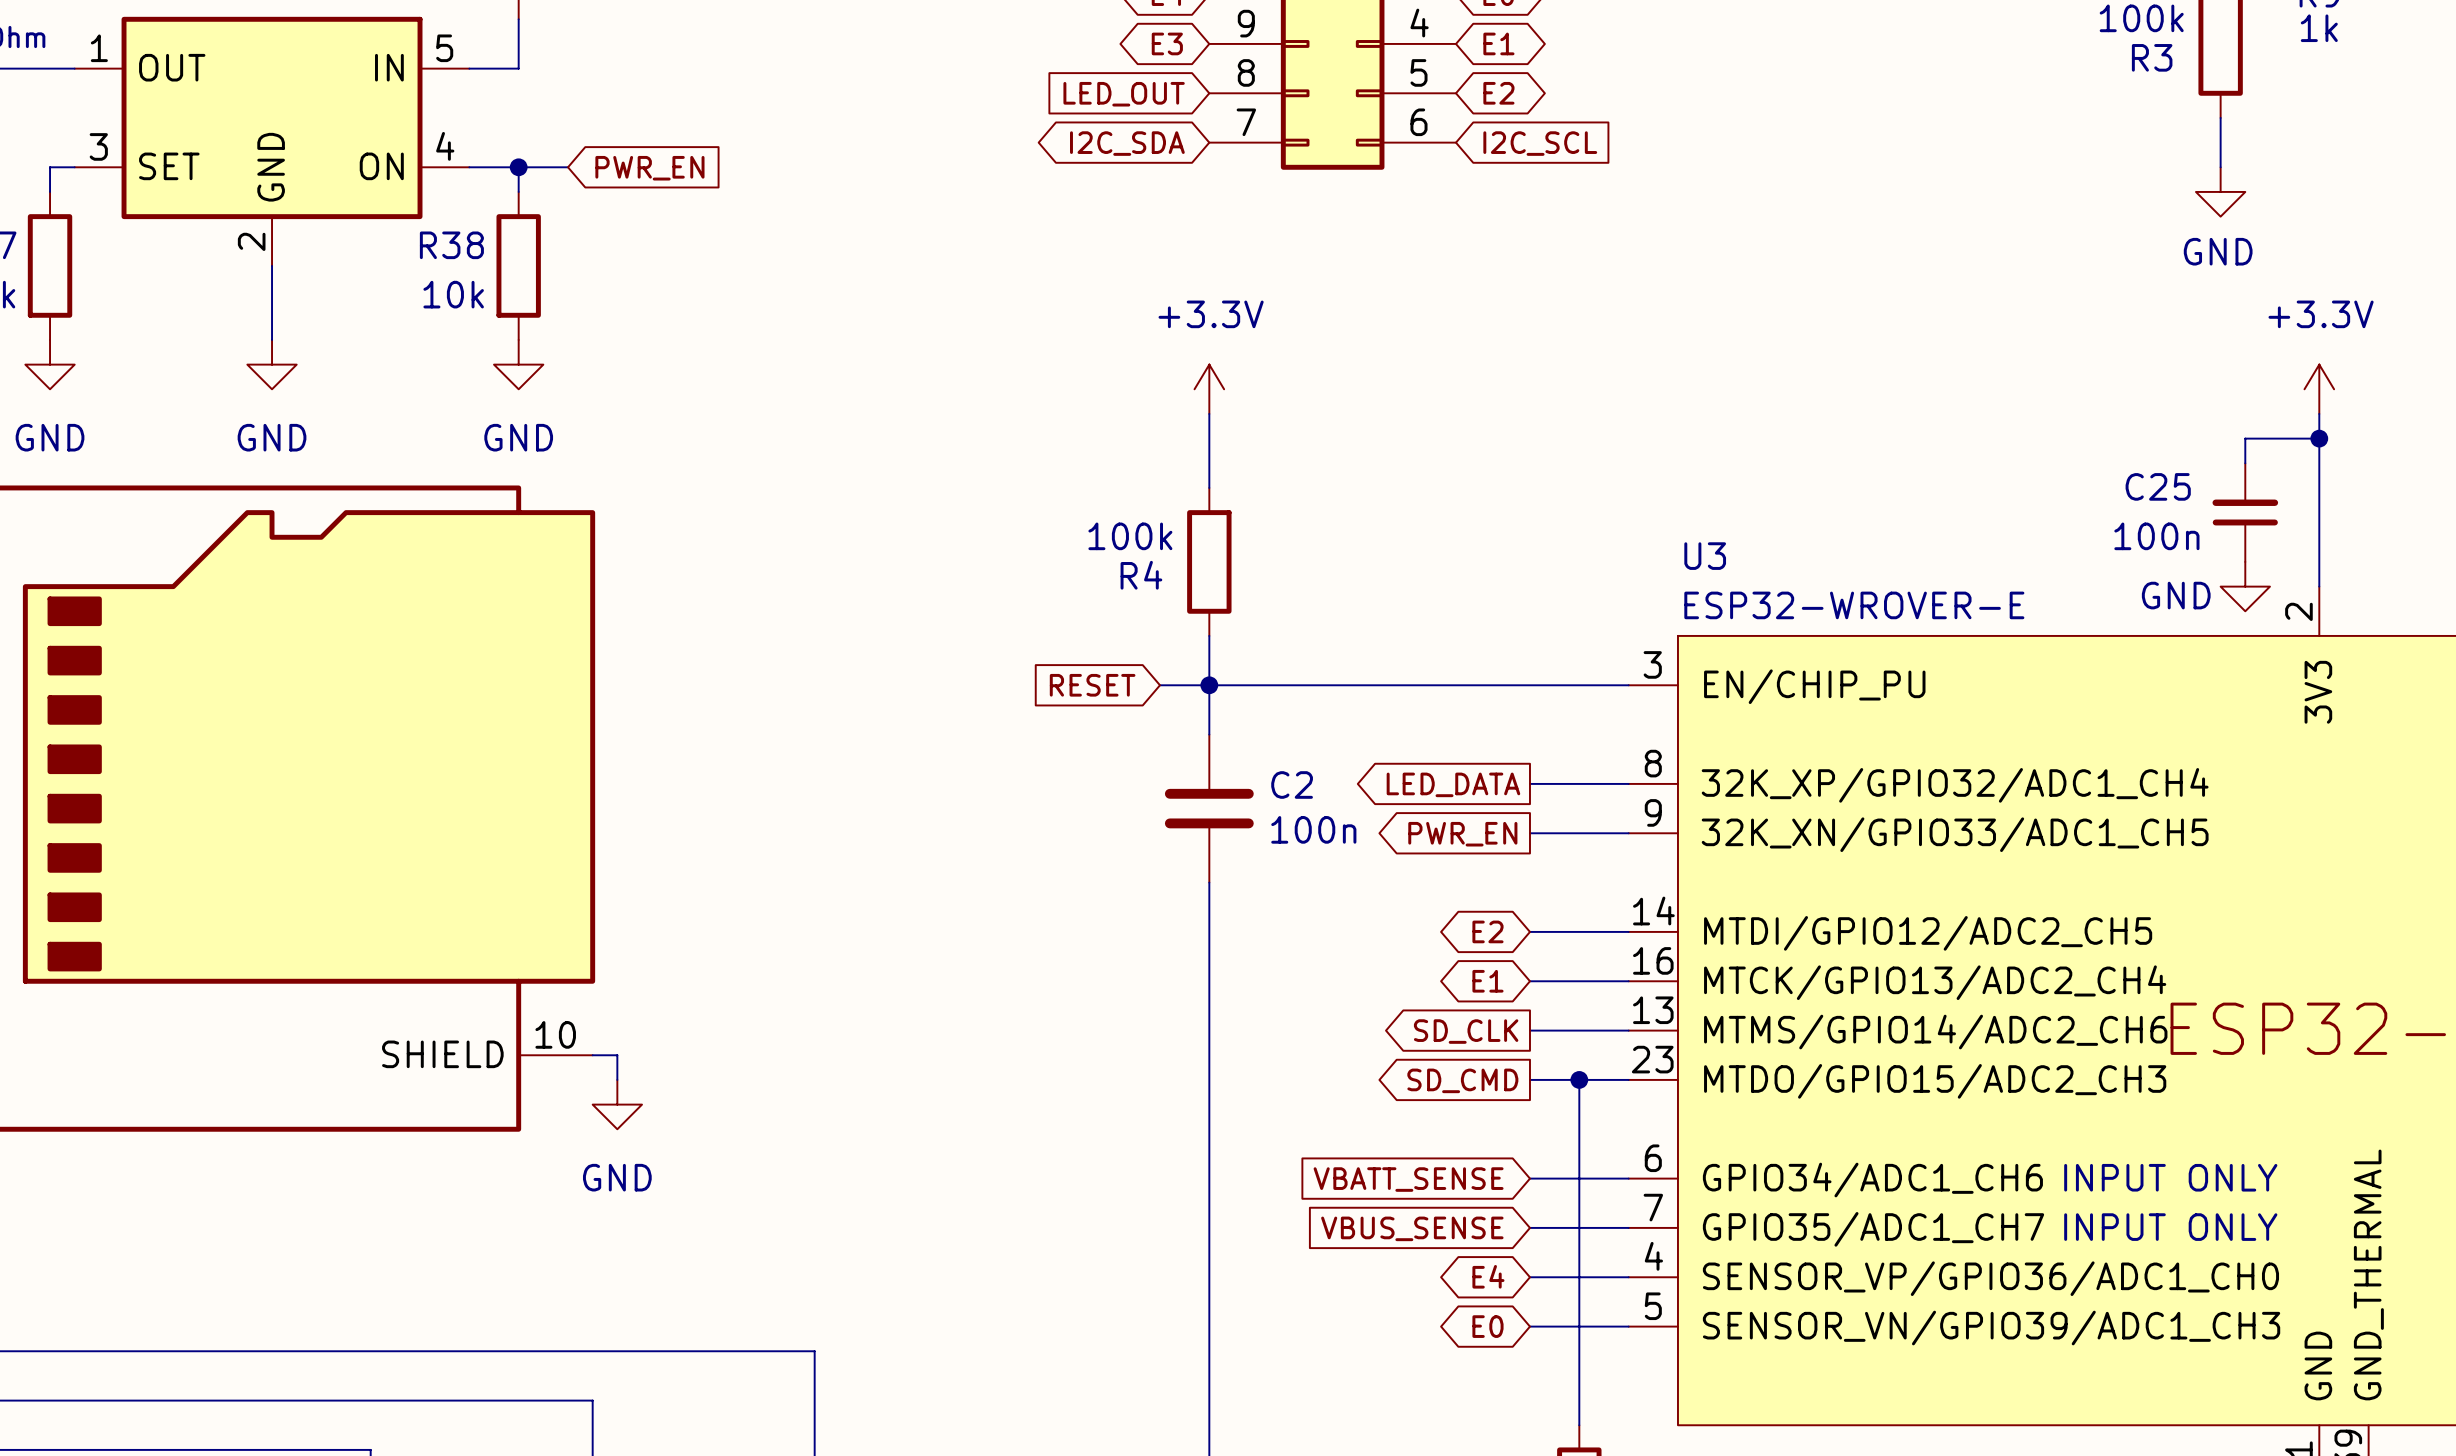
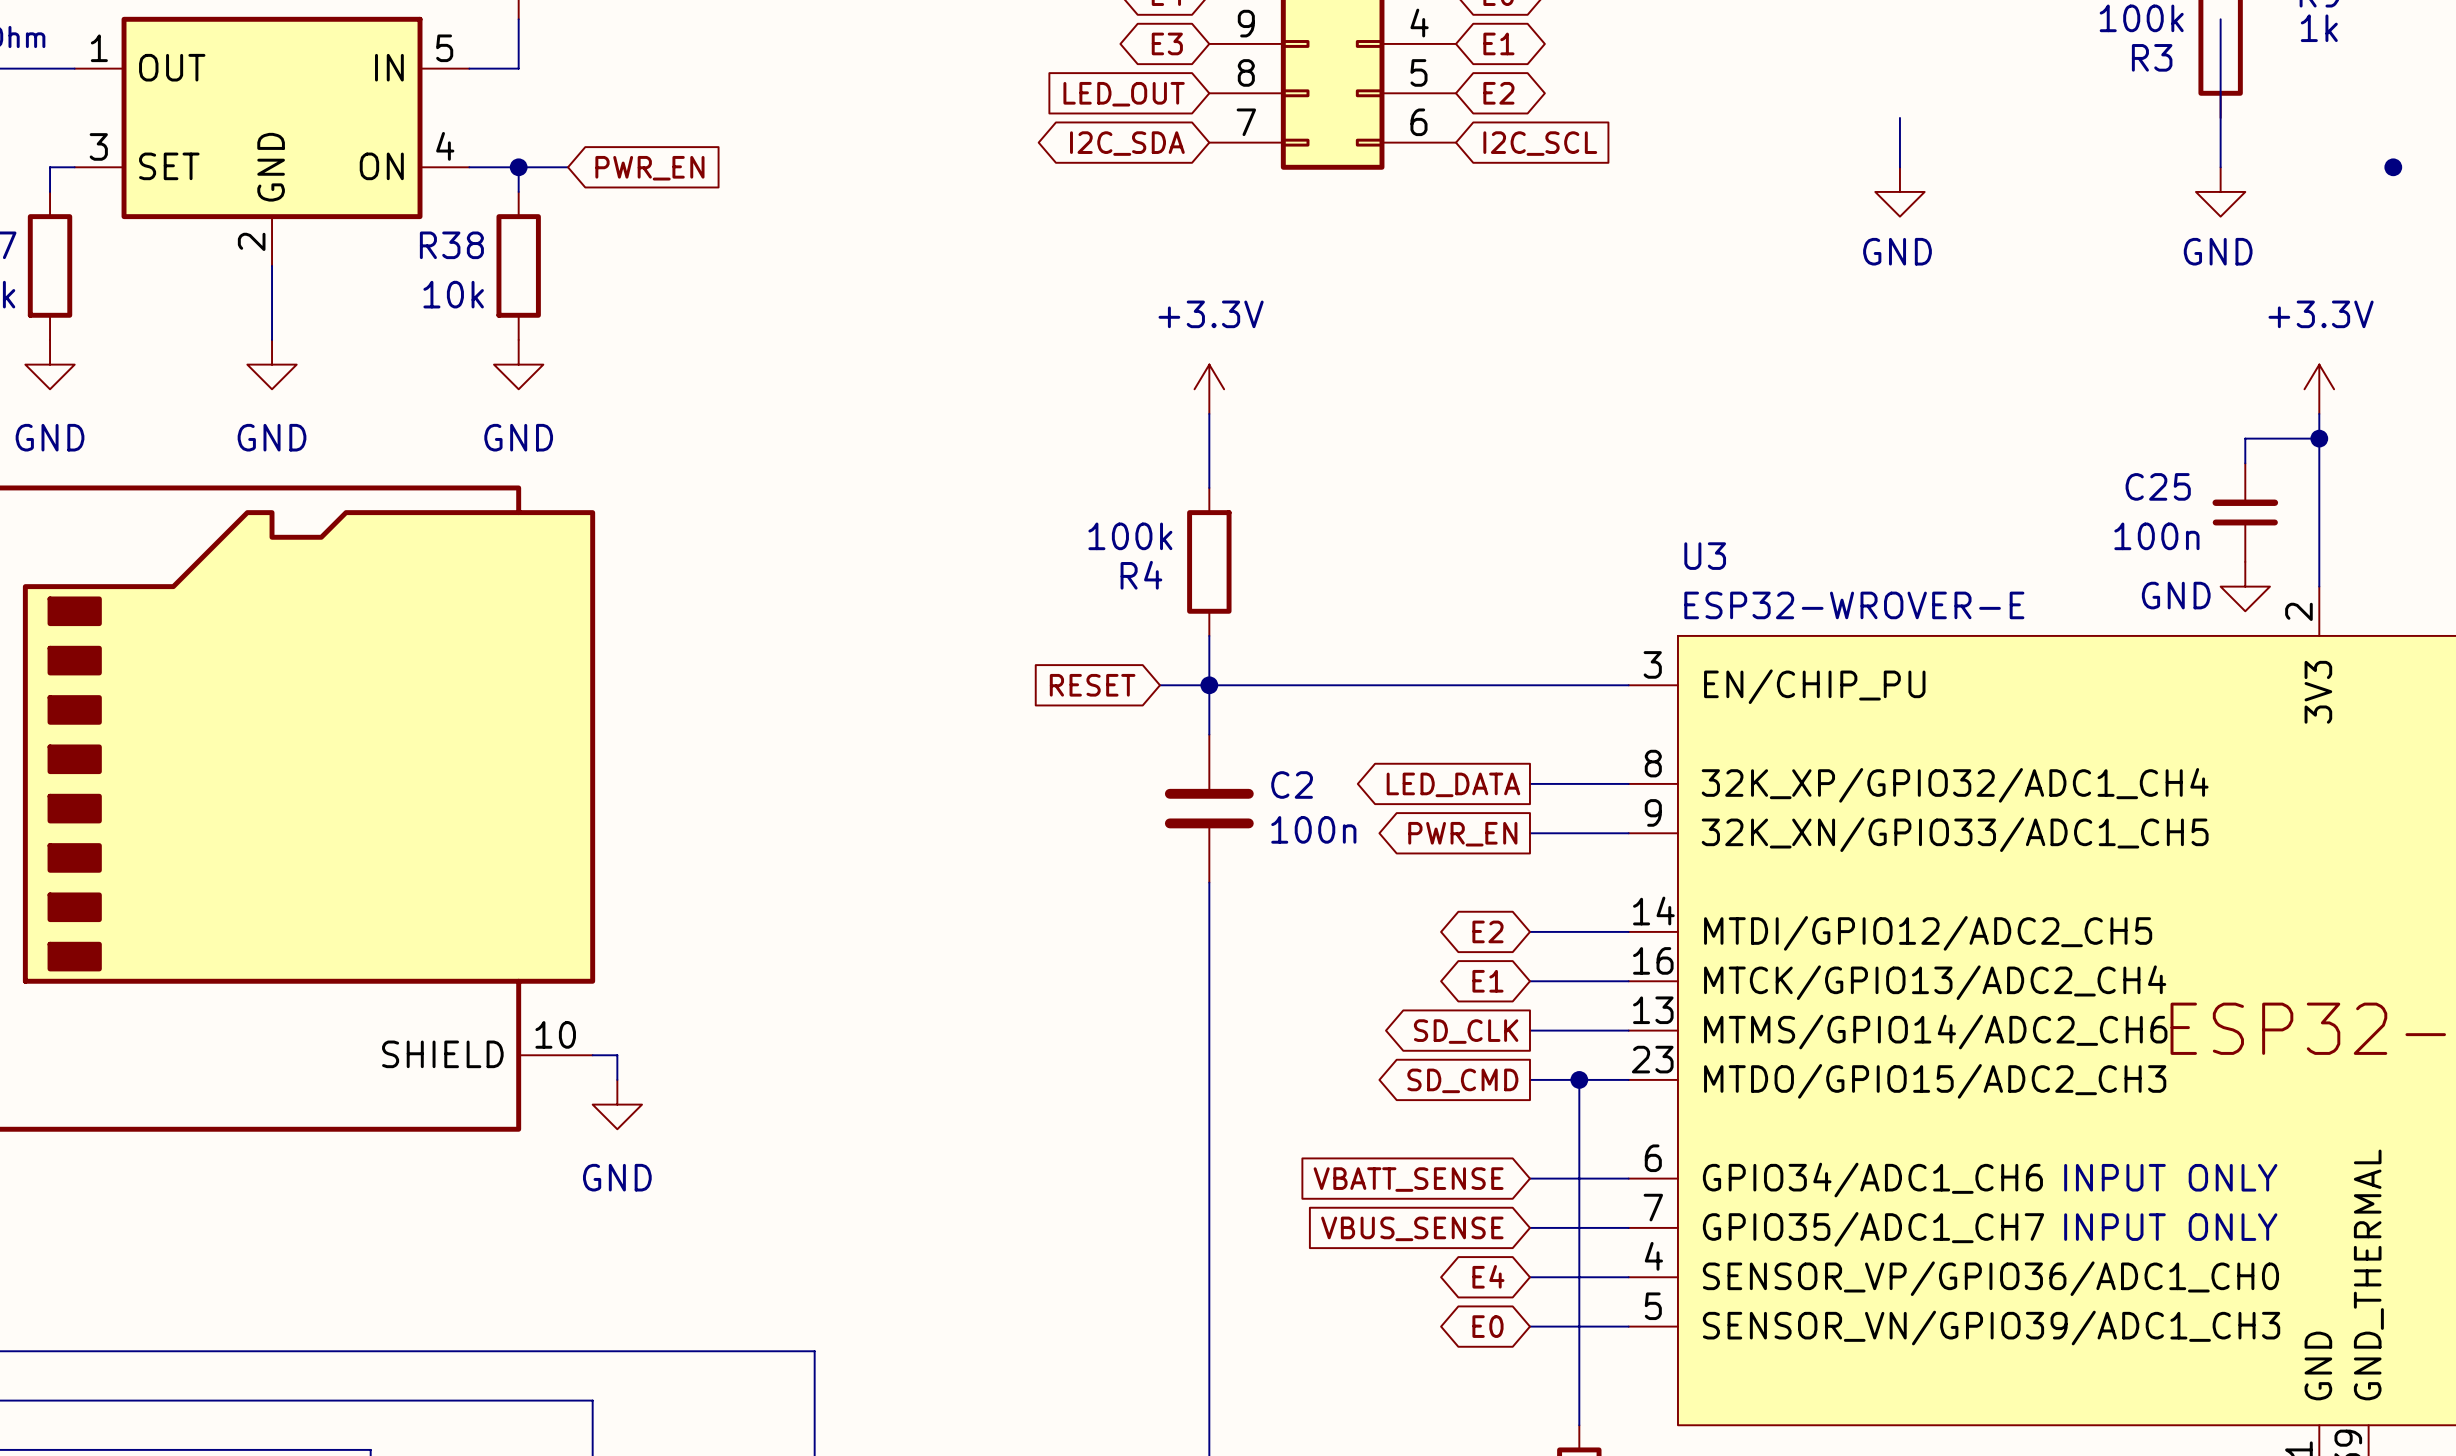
wire: none -> (2220, 19) (2220, 117)
wire: none -> (1899, 117) (1899, 167)
junction: none -> (2393, 167)
power symbol: none -> GND (1899, 191)

